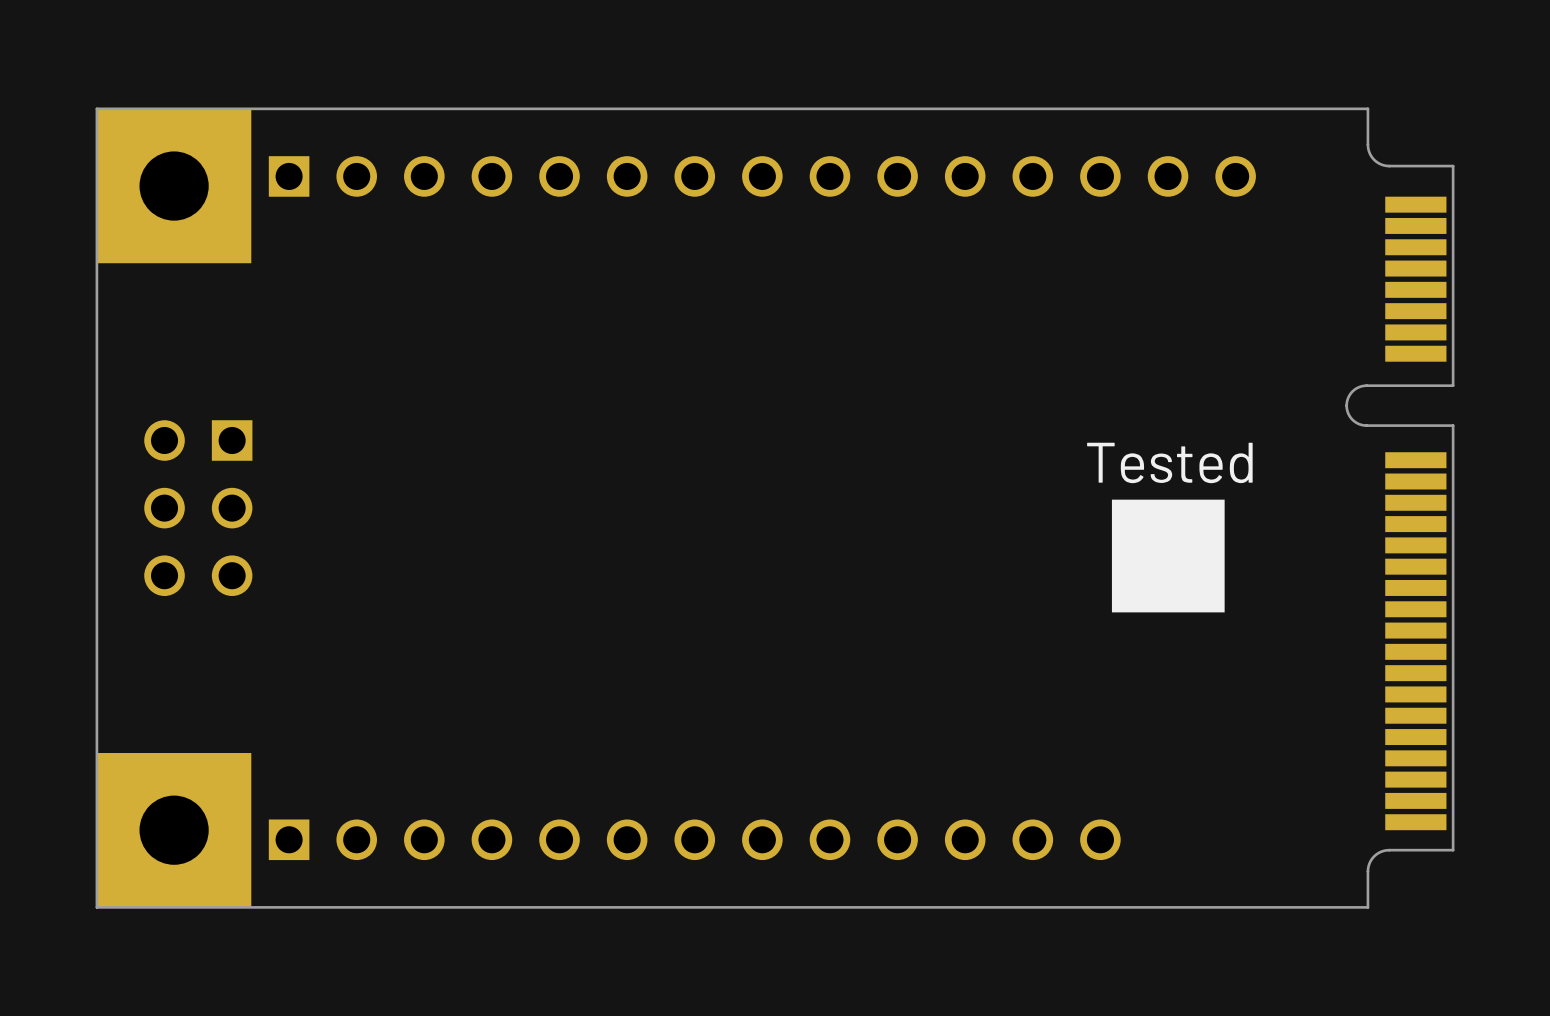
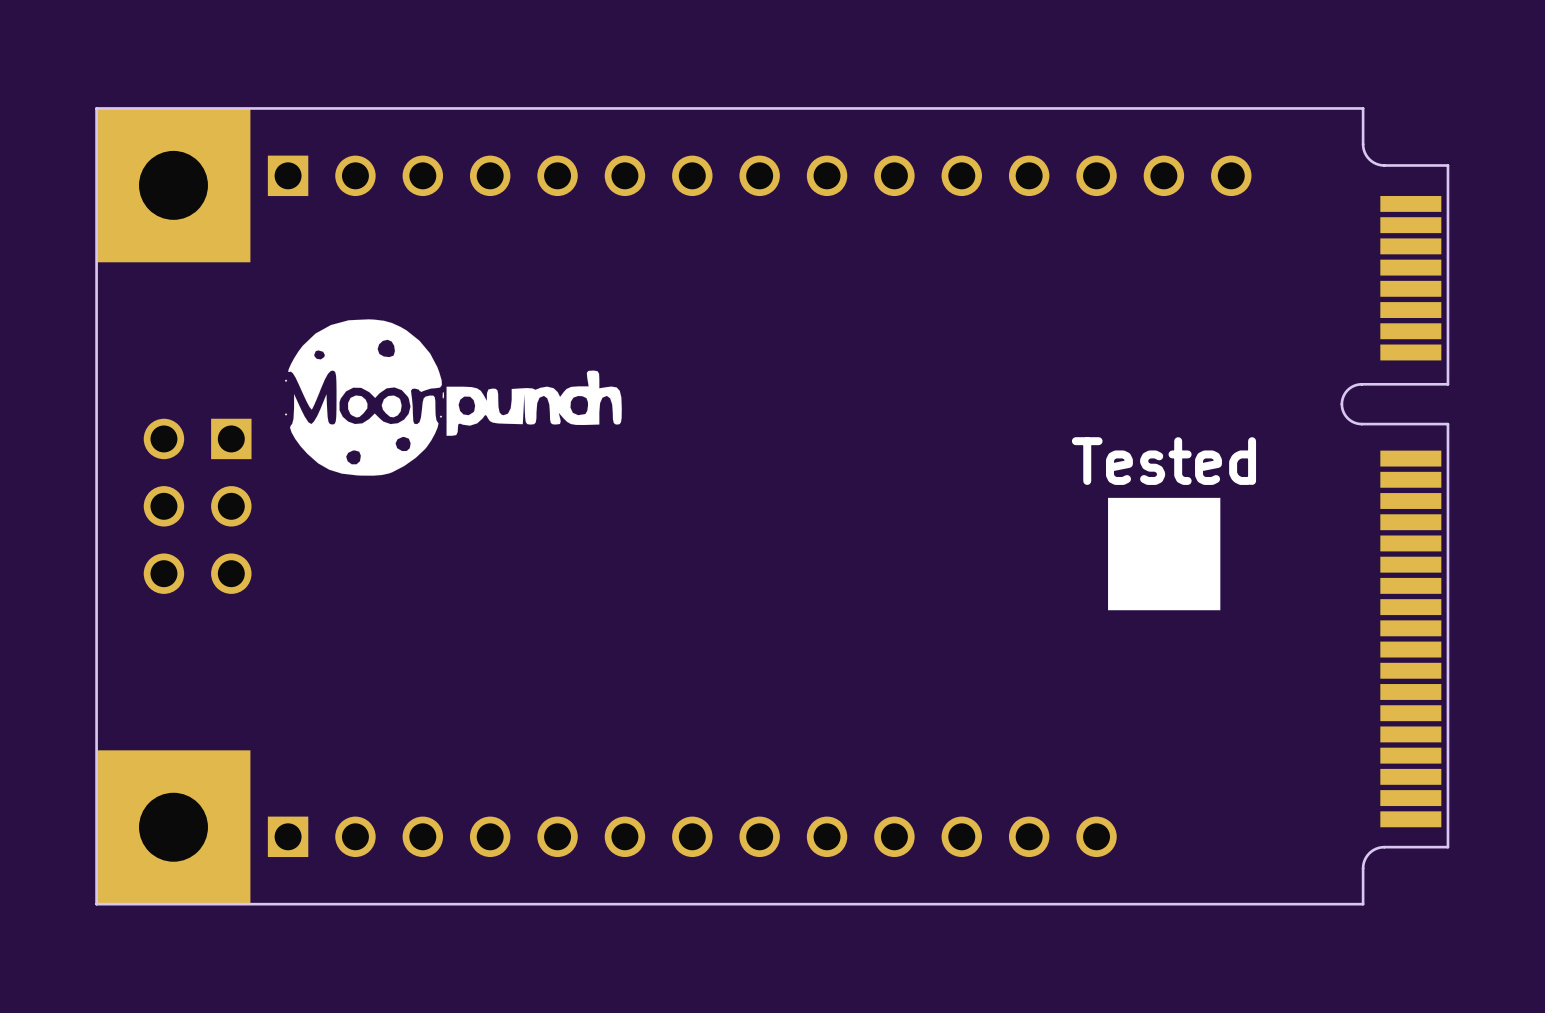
drawing: none -> [284, 319, 622, 476]

